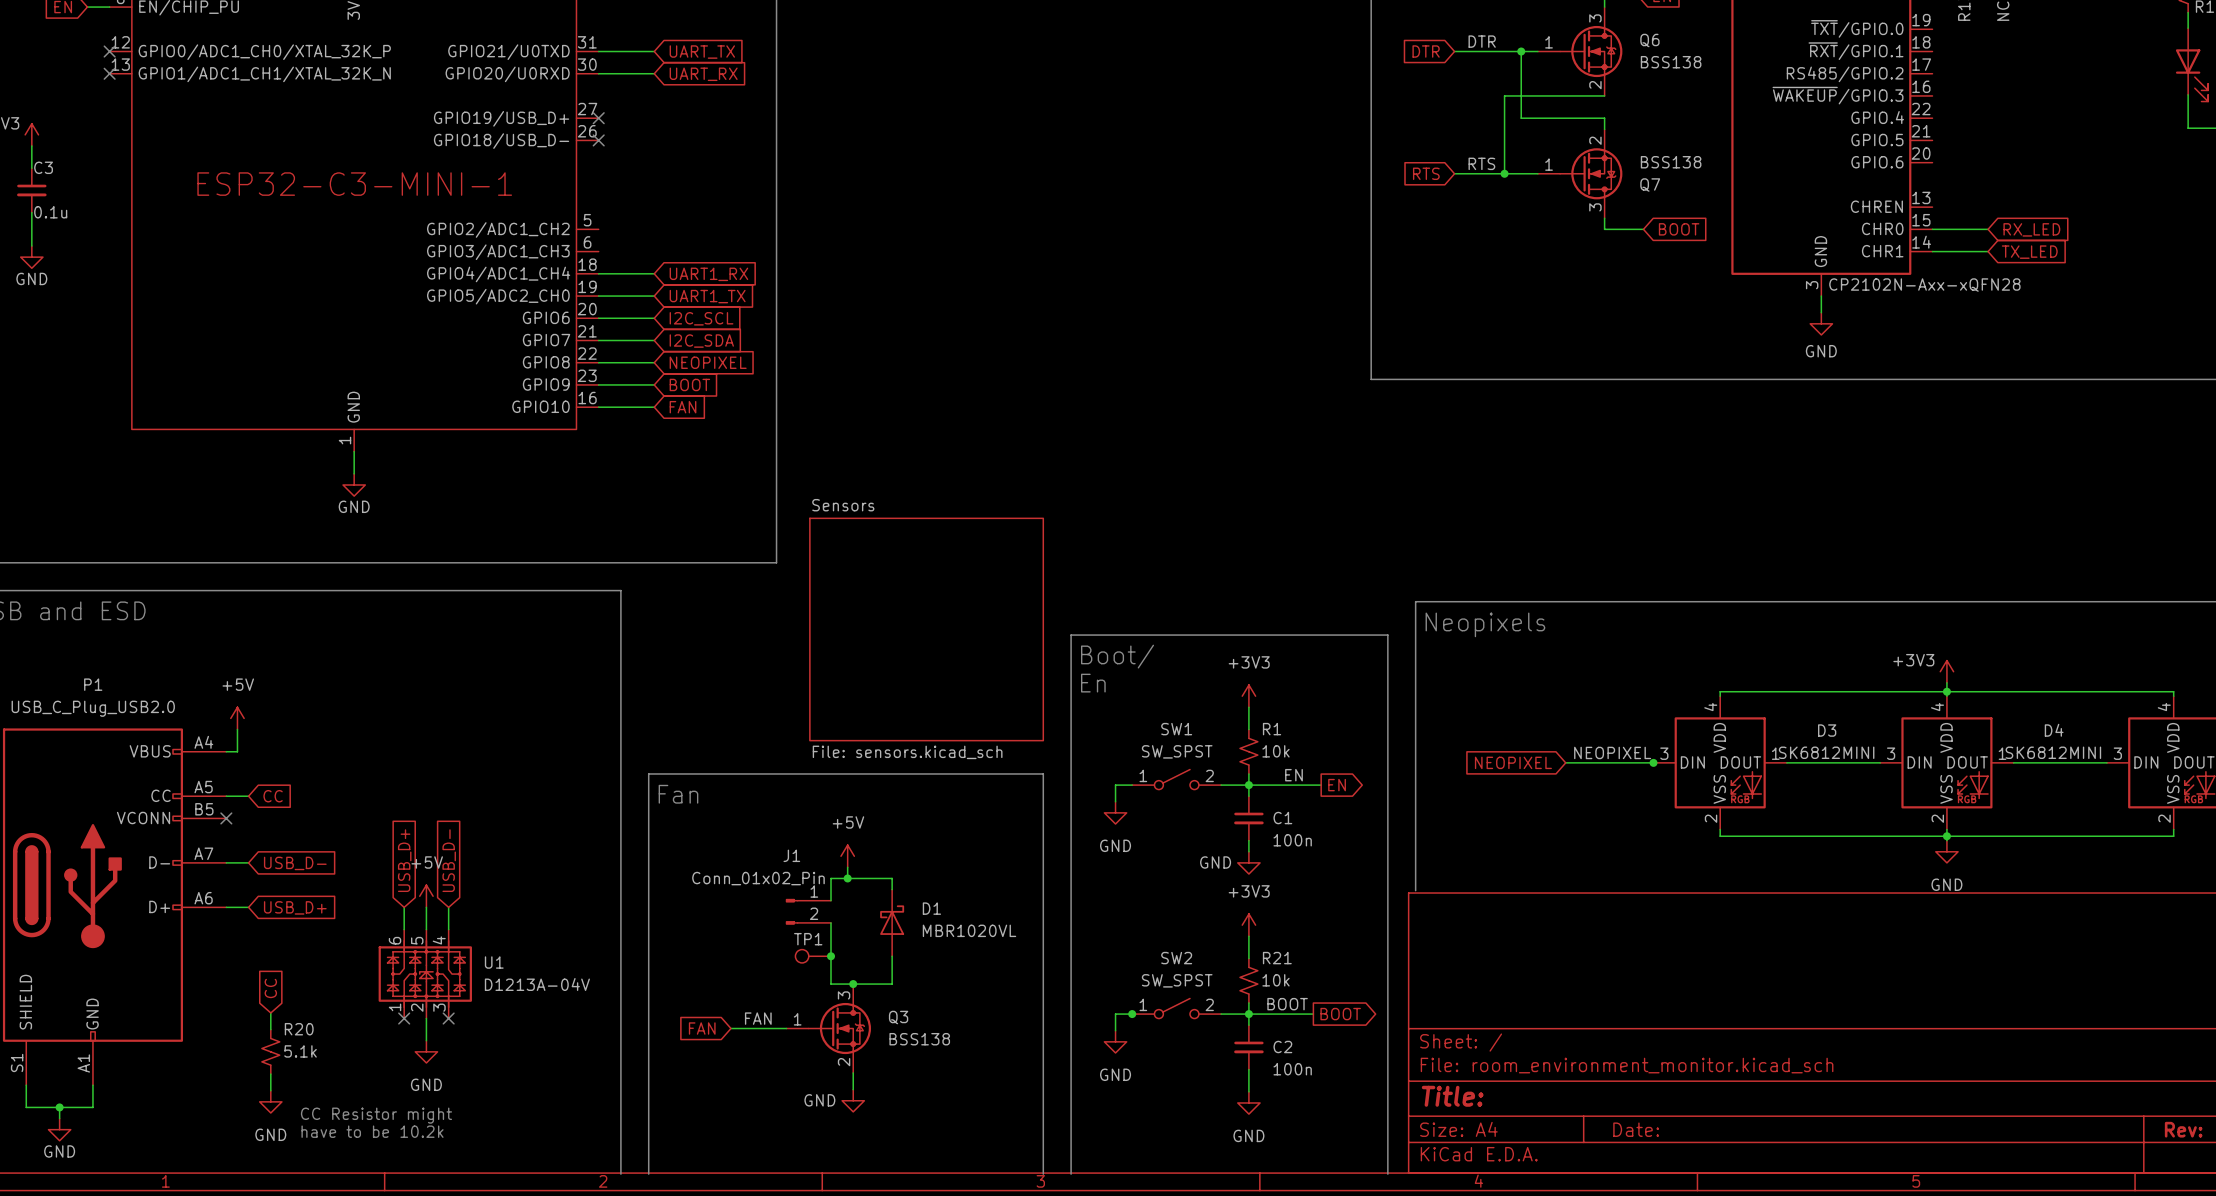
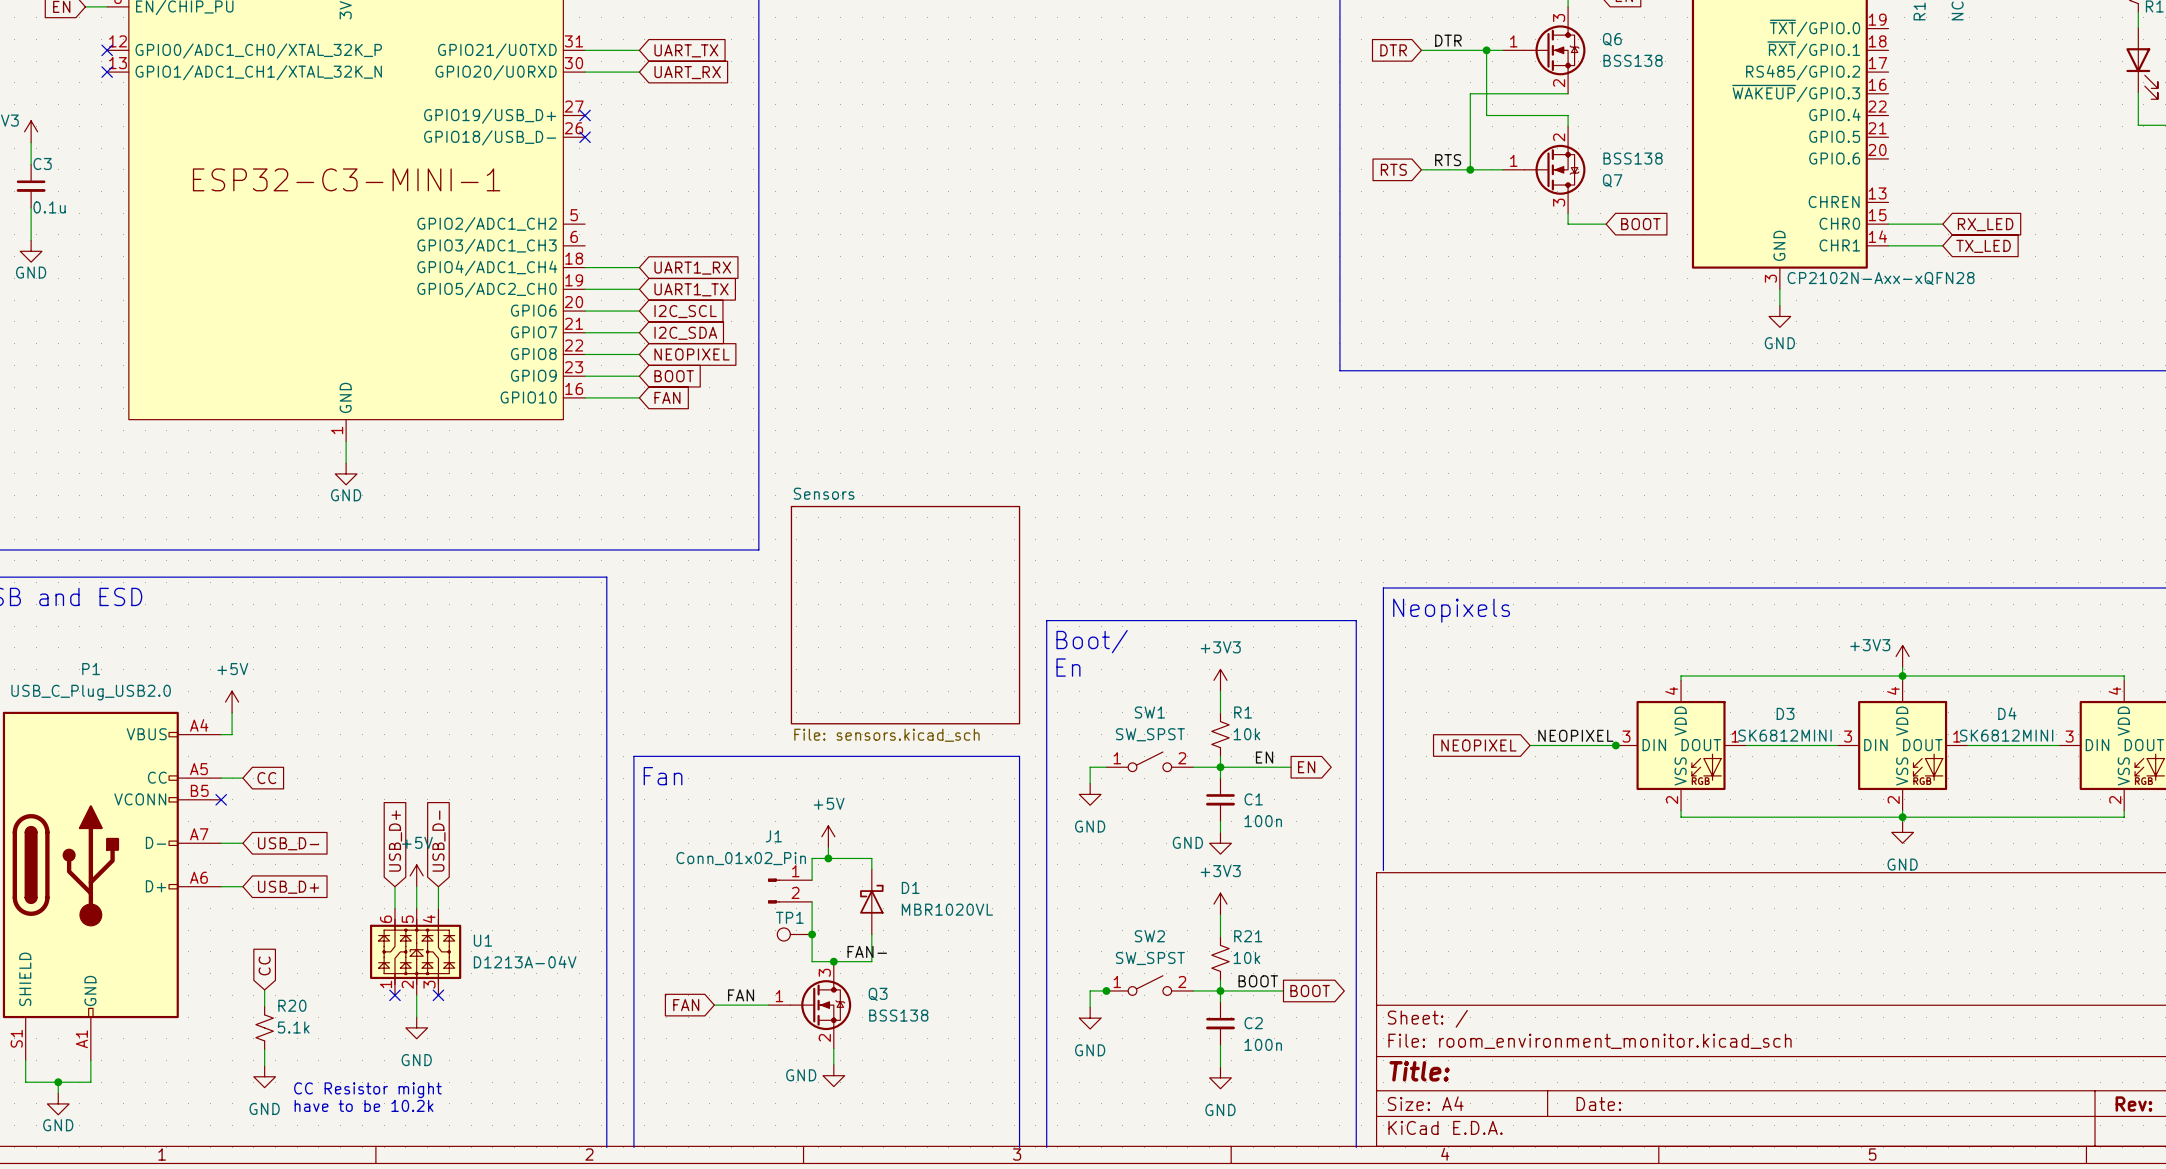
label: none -> FAN- (867, 951)

